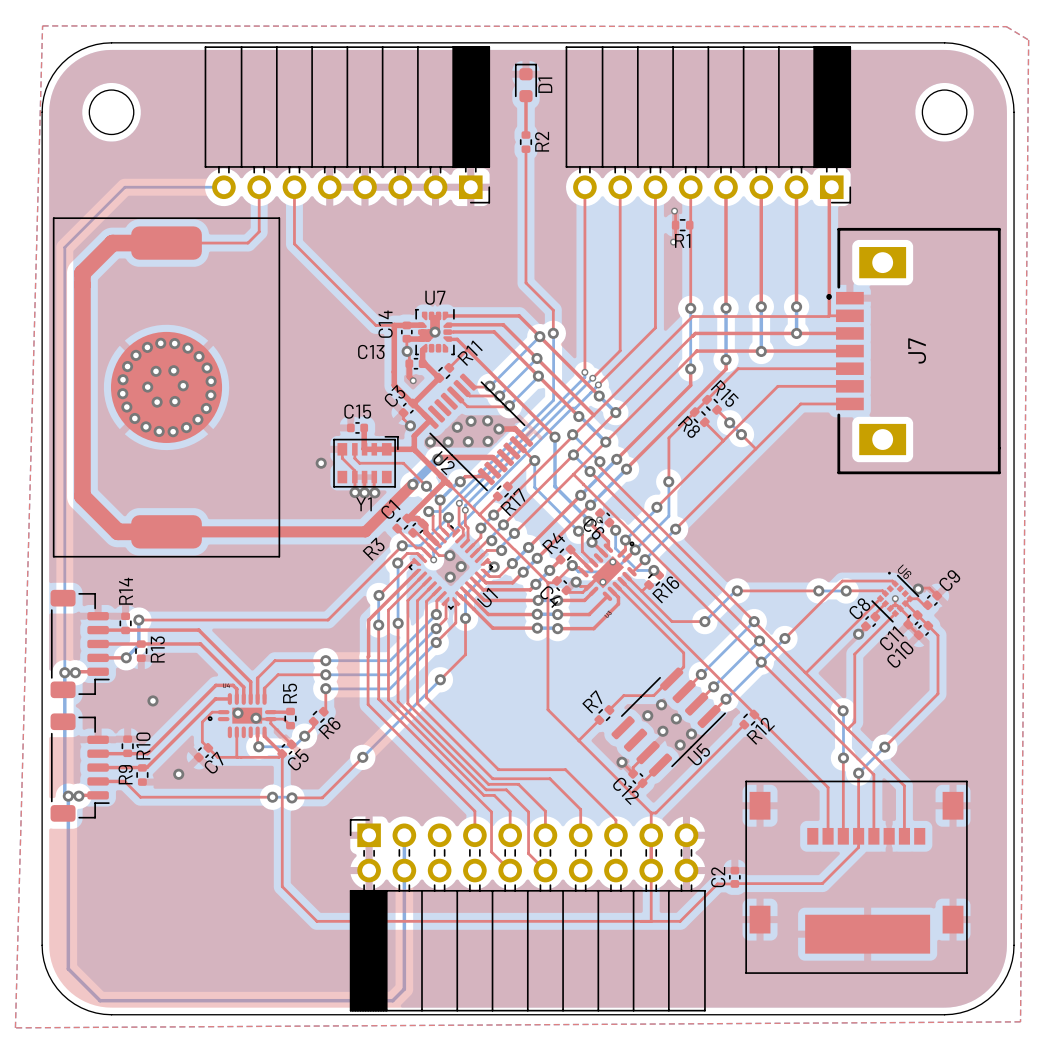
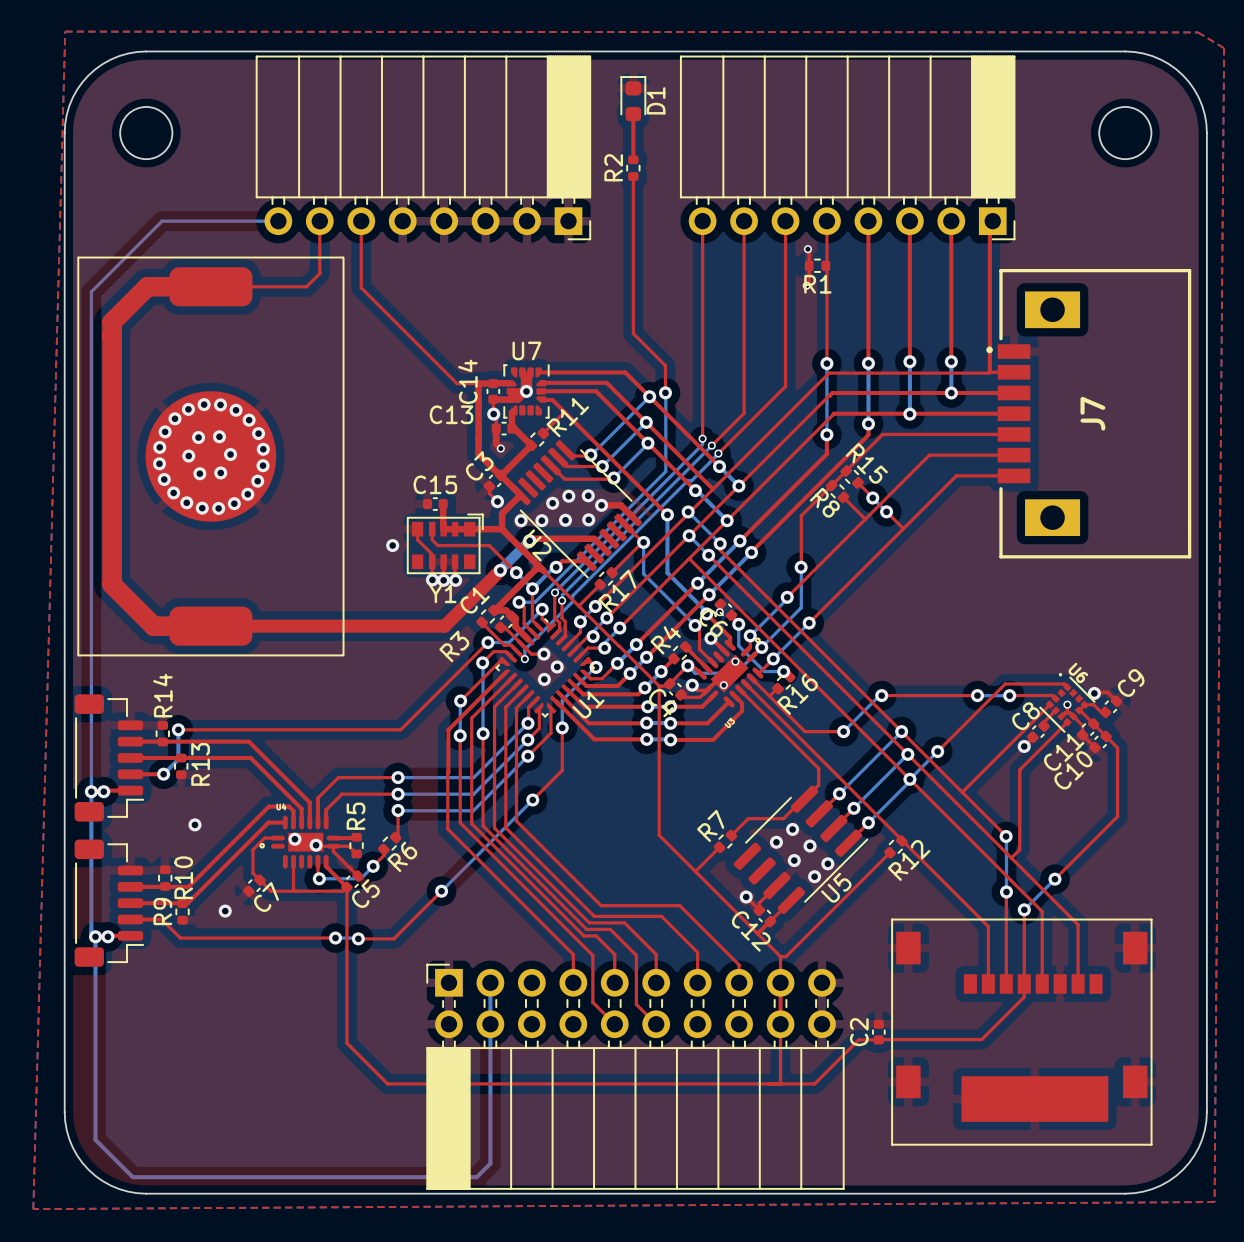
R2 name position: R2 (542, 141) -> R2 (613, 167)

